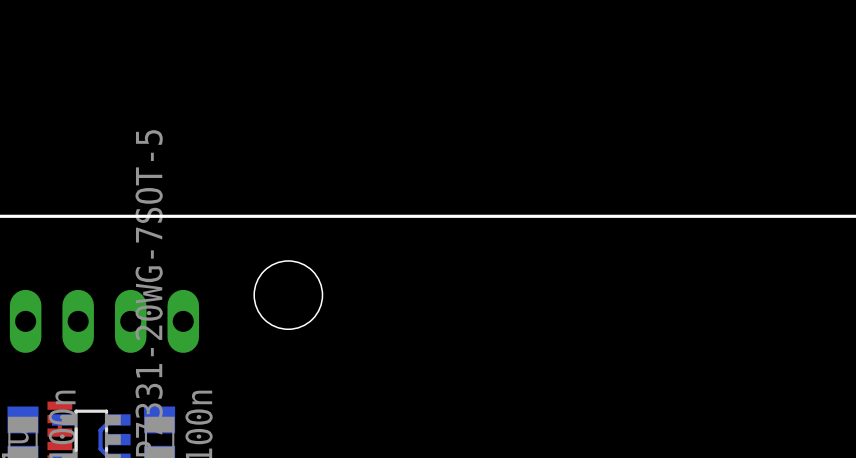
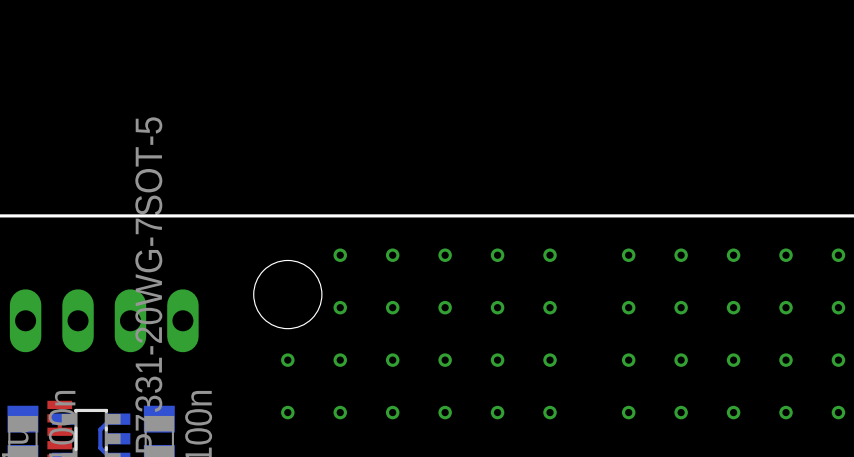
via: none -> (340, 255)
via: none -> (392, 255)
via: none -> (445, 255)
via: none -> (497, 255)
via: none -> (550, 255)
via: none -> (628, 255)
via: none -> (681, 255)
via: none -> (733, 255)
via: none -> (786, 255)
via: none -> (838, 255)
via: none -> (340, 307)
via: none -> (392, 307)
via: none -> (445, 307)
via: none -> (497, 307)
via: none -> (550, 307)
via: none -> (628, 307)
via: none -> (681, 307)
via: none -> (733, 307)
via: none -> (786, 307)
via: none -> (838, 307)
via: none -> (287, 360)
via: none -> (340, 360)
via: none -> (392, 360)
via: none -> (445, 360)
via: none -> (497, 360)
via: none -> (550, 360)
via: none -> (628, 360)
via: none -> (681, 360)
via: none -> (733, 360)
via: none -> (786, 360)
via: none -> (838, 360)
via: none -> (287, 412)
via: none -> (340, 412)
via: none -> (392, 412)
via: none -> (445, 412)
via: none -> (497, 412)
via: none -> (550, 412)
via: none -> (628, 412)
via: none -> (681, 412)
via: none -> (733, 412)
via: none -> (786, 412)
via: none -> (838, 412)

